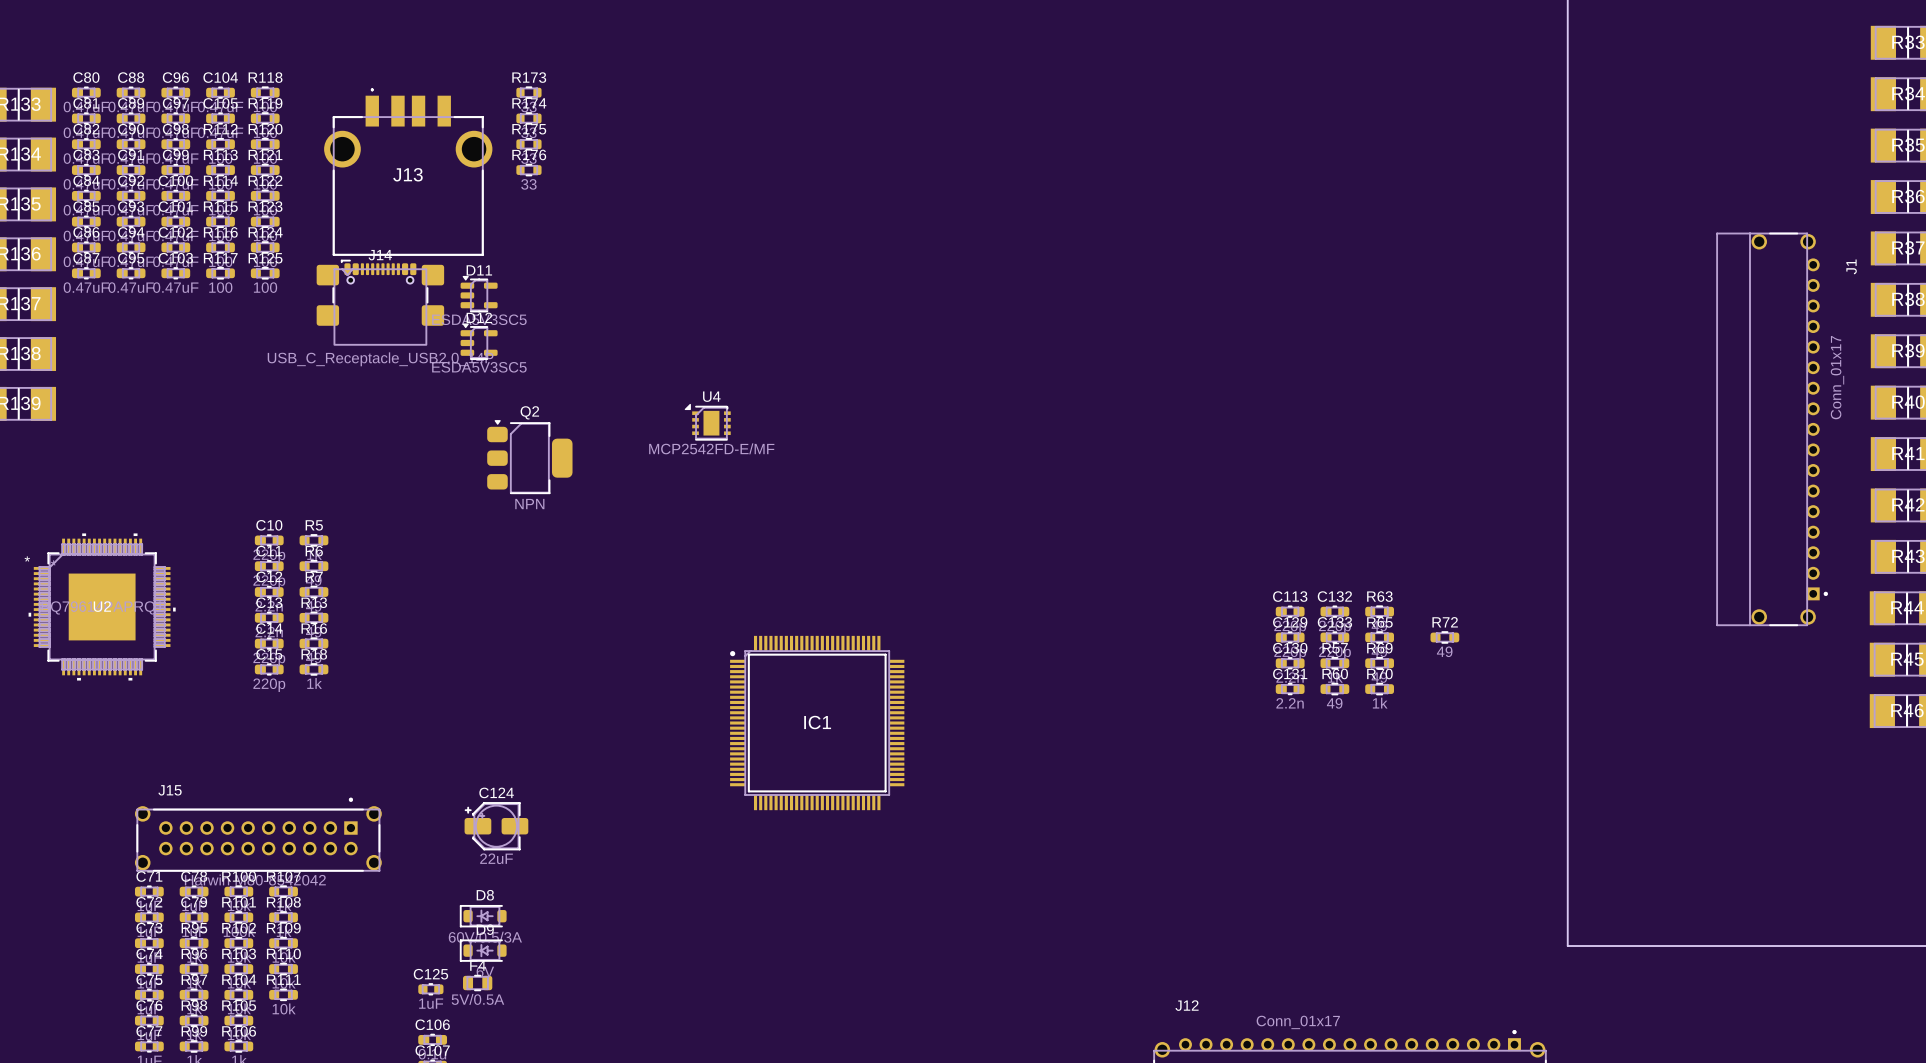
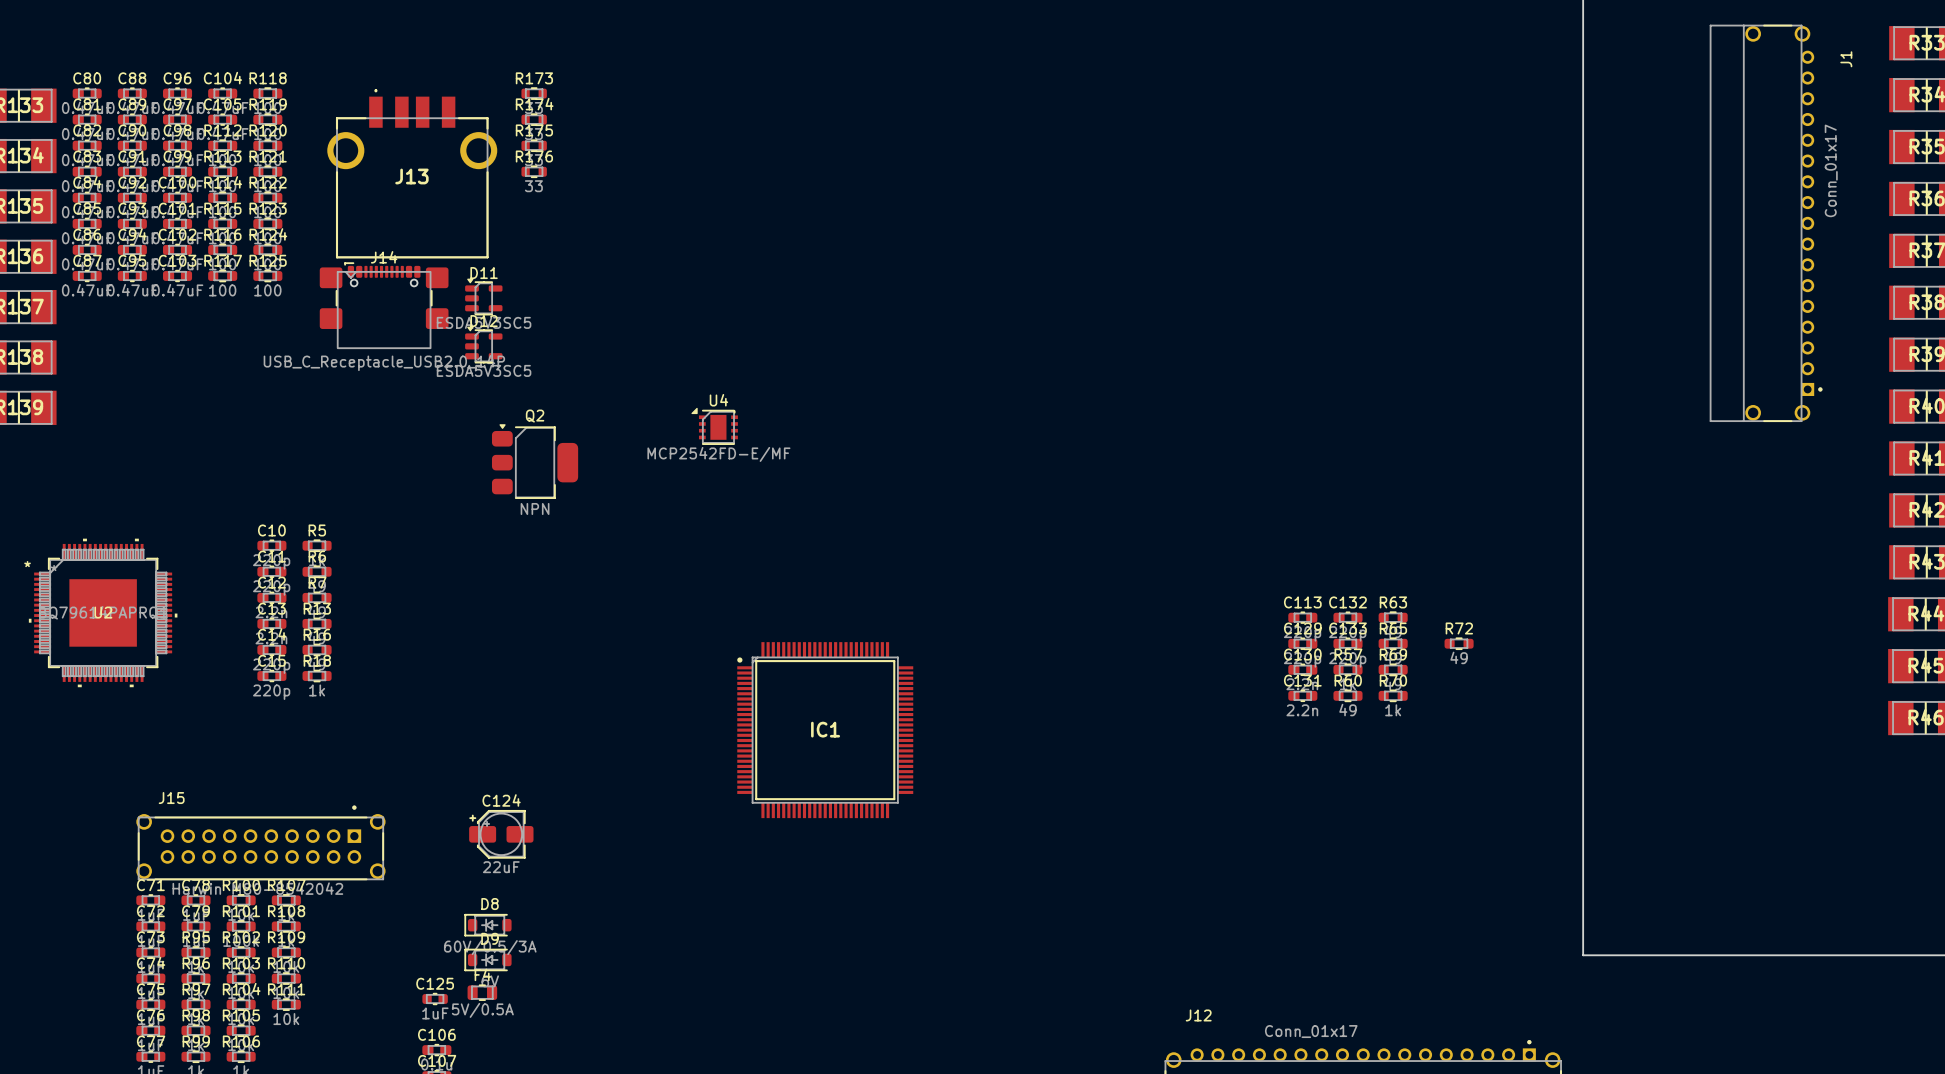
J1 position: (1772, 429) -> (1766, 223)

